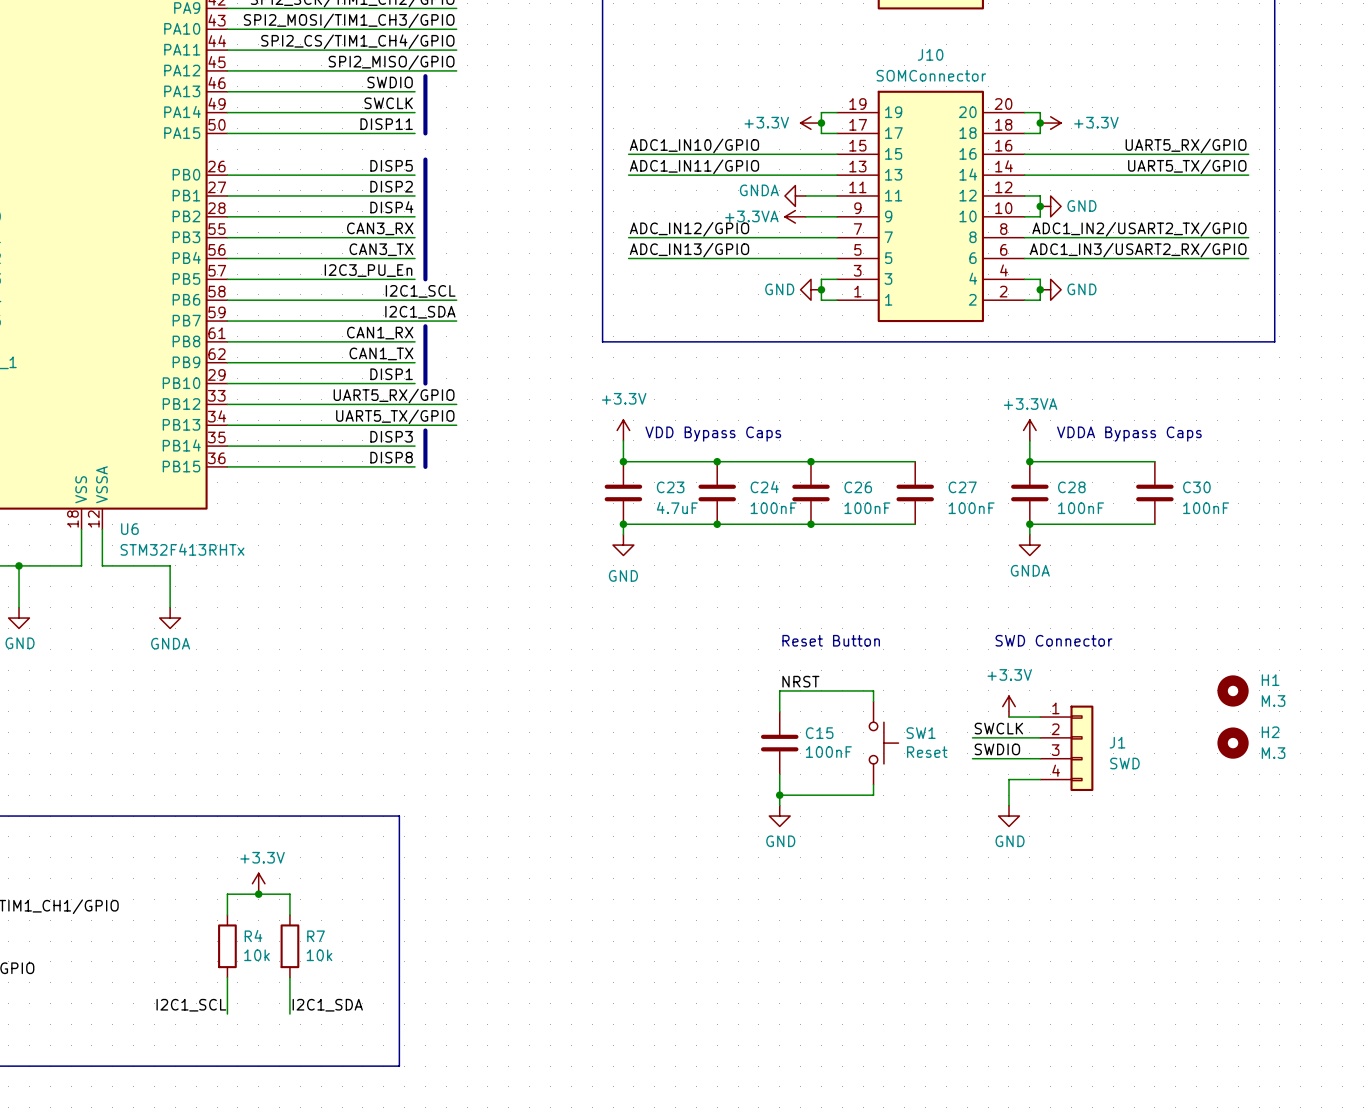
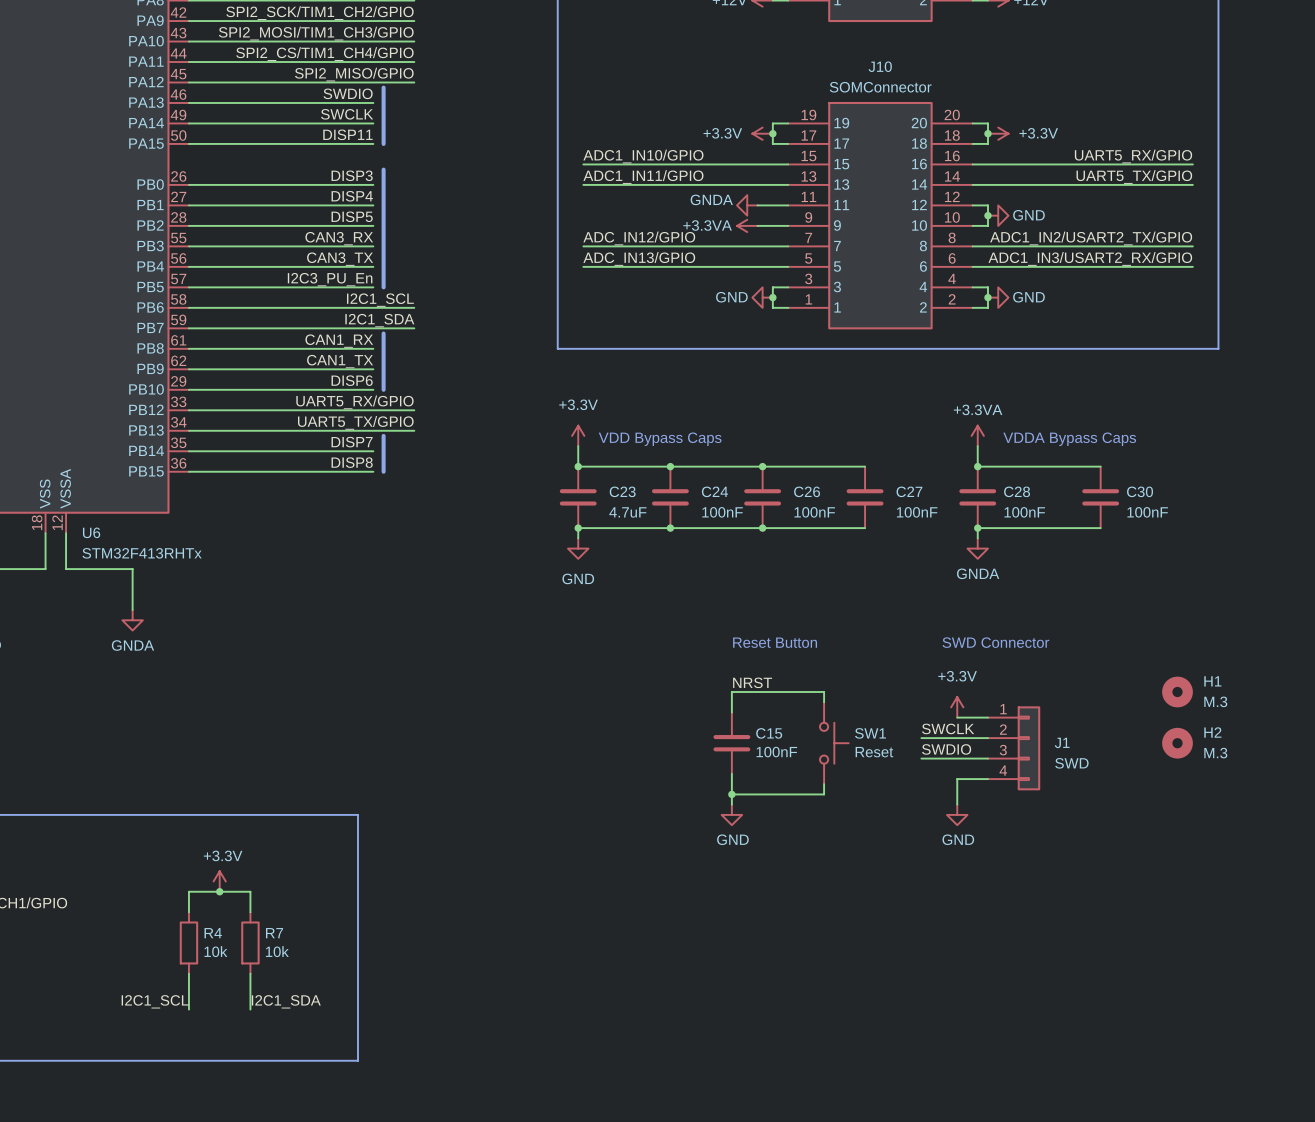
label: DISP5 (391, 165) -> DISP3 (352, 175)
label: DISP2 (391, 186) -> DISP4 (352, 196)
label: DISP4 (391, 207) -> DISP5 (352, 216)
label: DISP1 (391, 374) -> DISP6 (352, 380)
label: DISP3 (391, 436) -> DISP7 (352, 442)

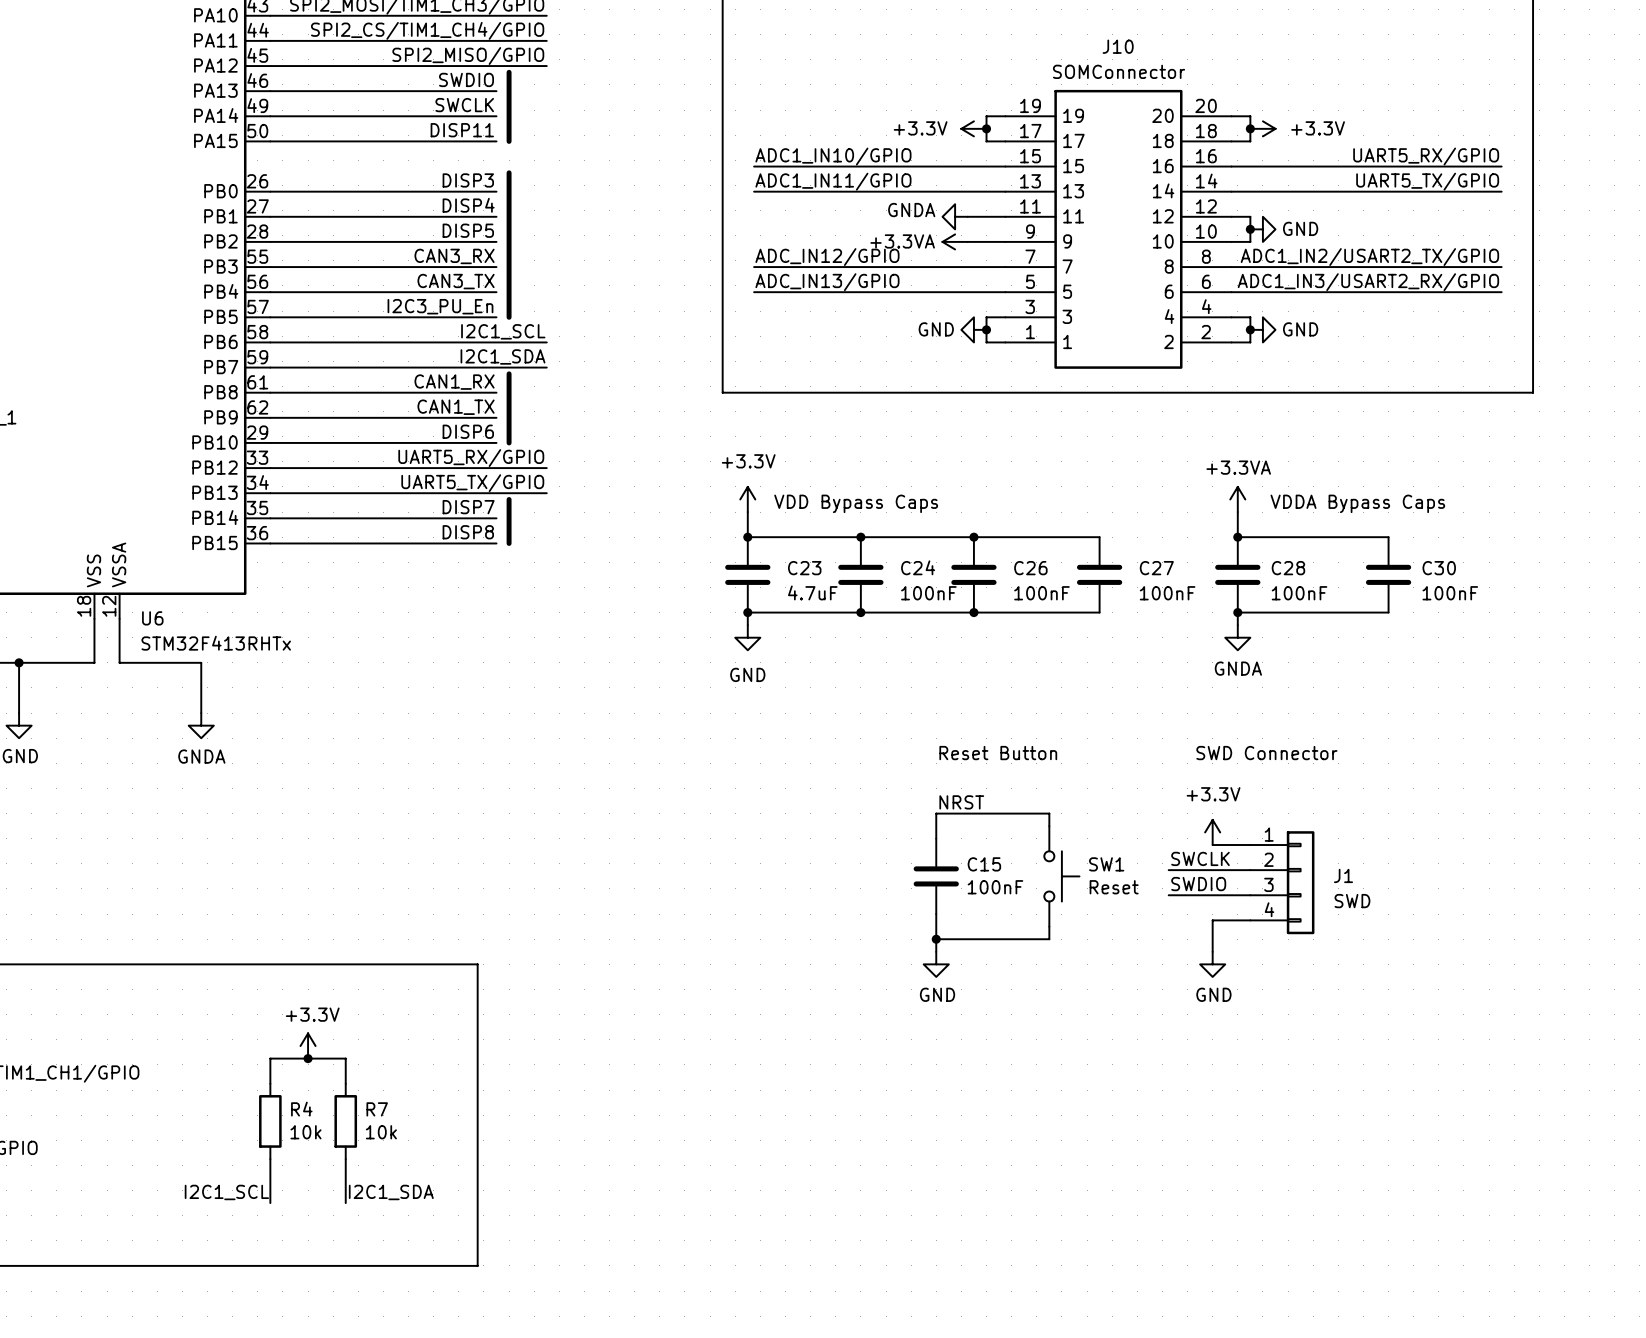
H1: M.3 (1177, 692) -> none
H2: M.3 (1177, 743) -> none

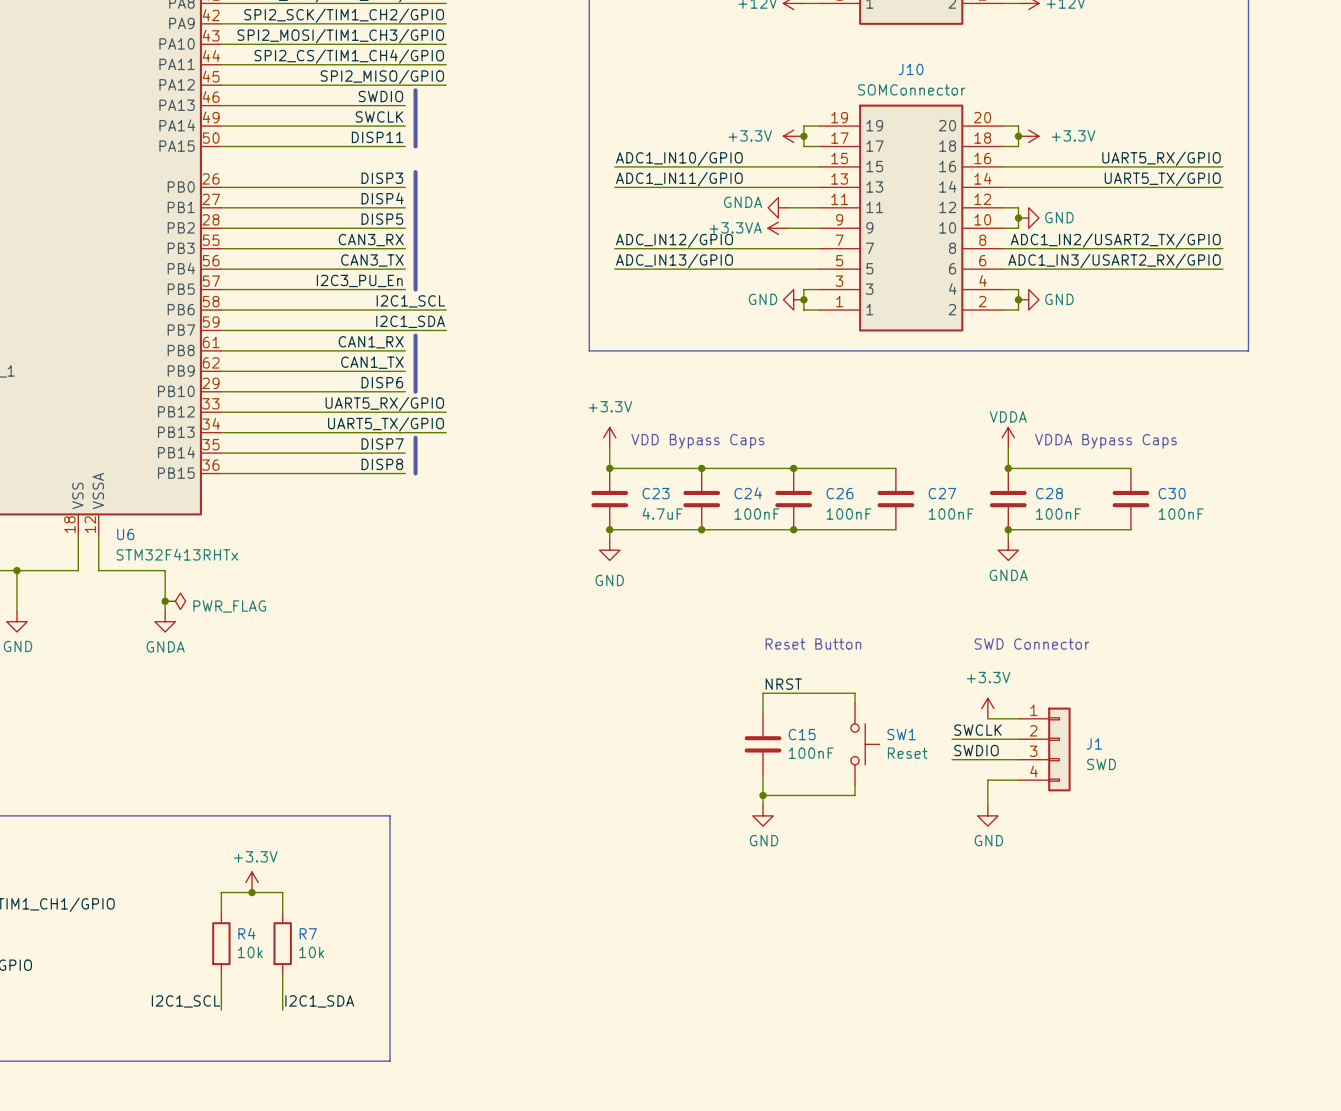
power symbol: +3.3VA (1237, 499) -> VDDA (1008, 437)
junction: none -> (165, 601)
power symbol: none -> PWR_FLAG (175, 601)

